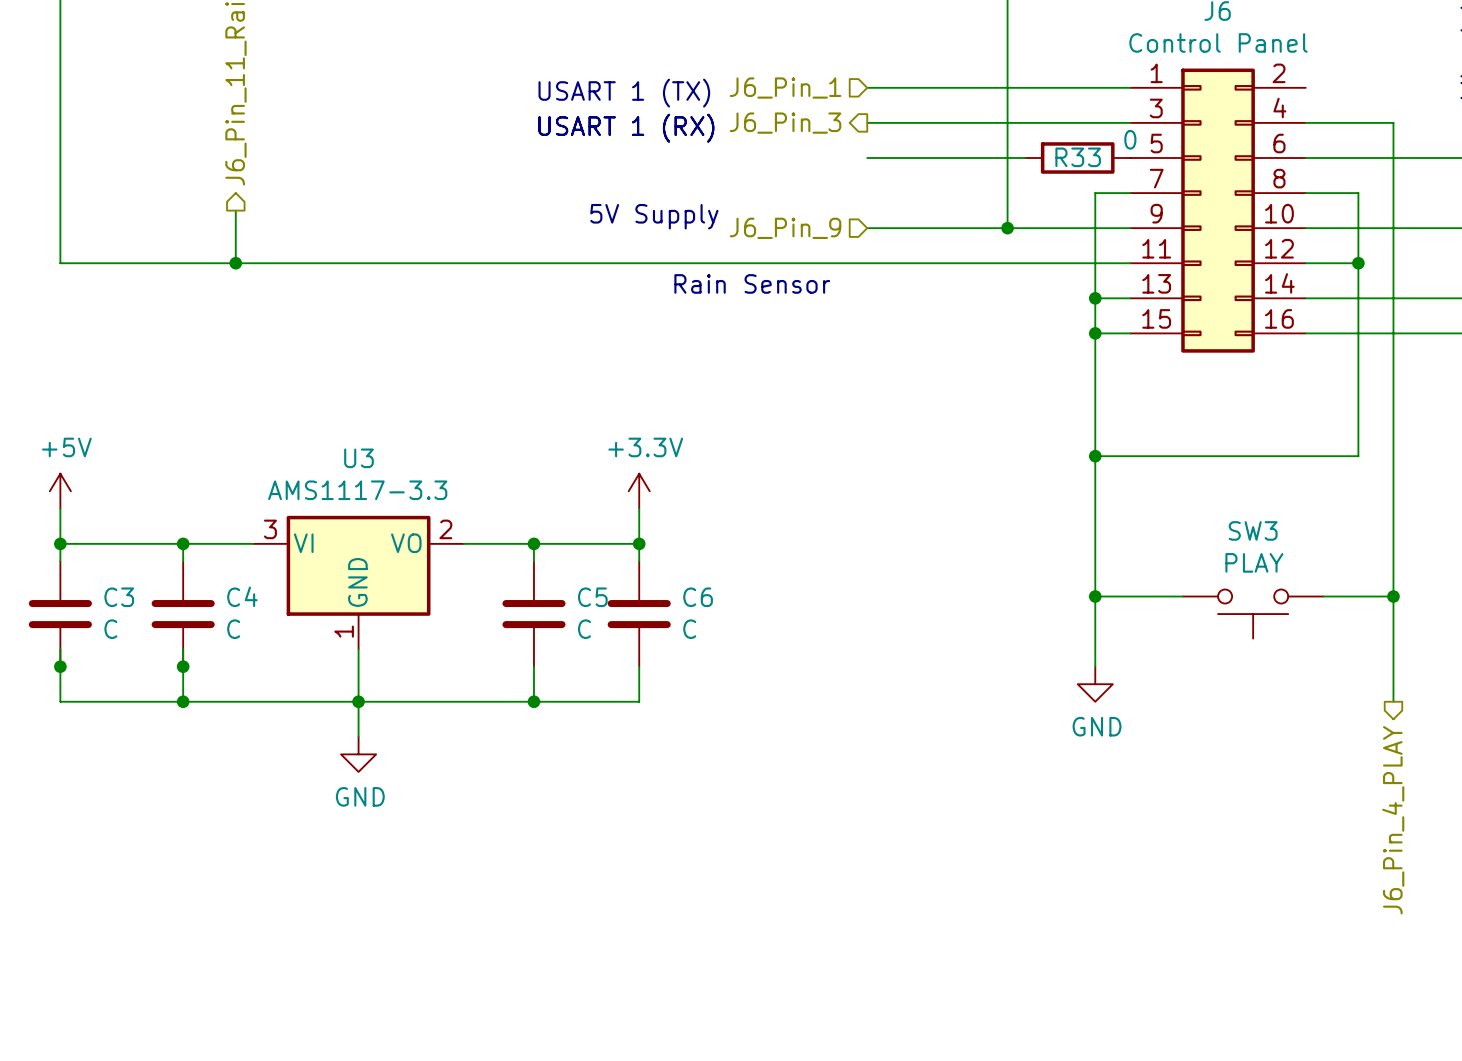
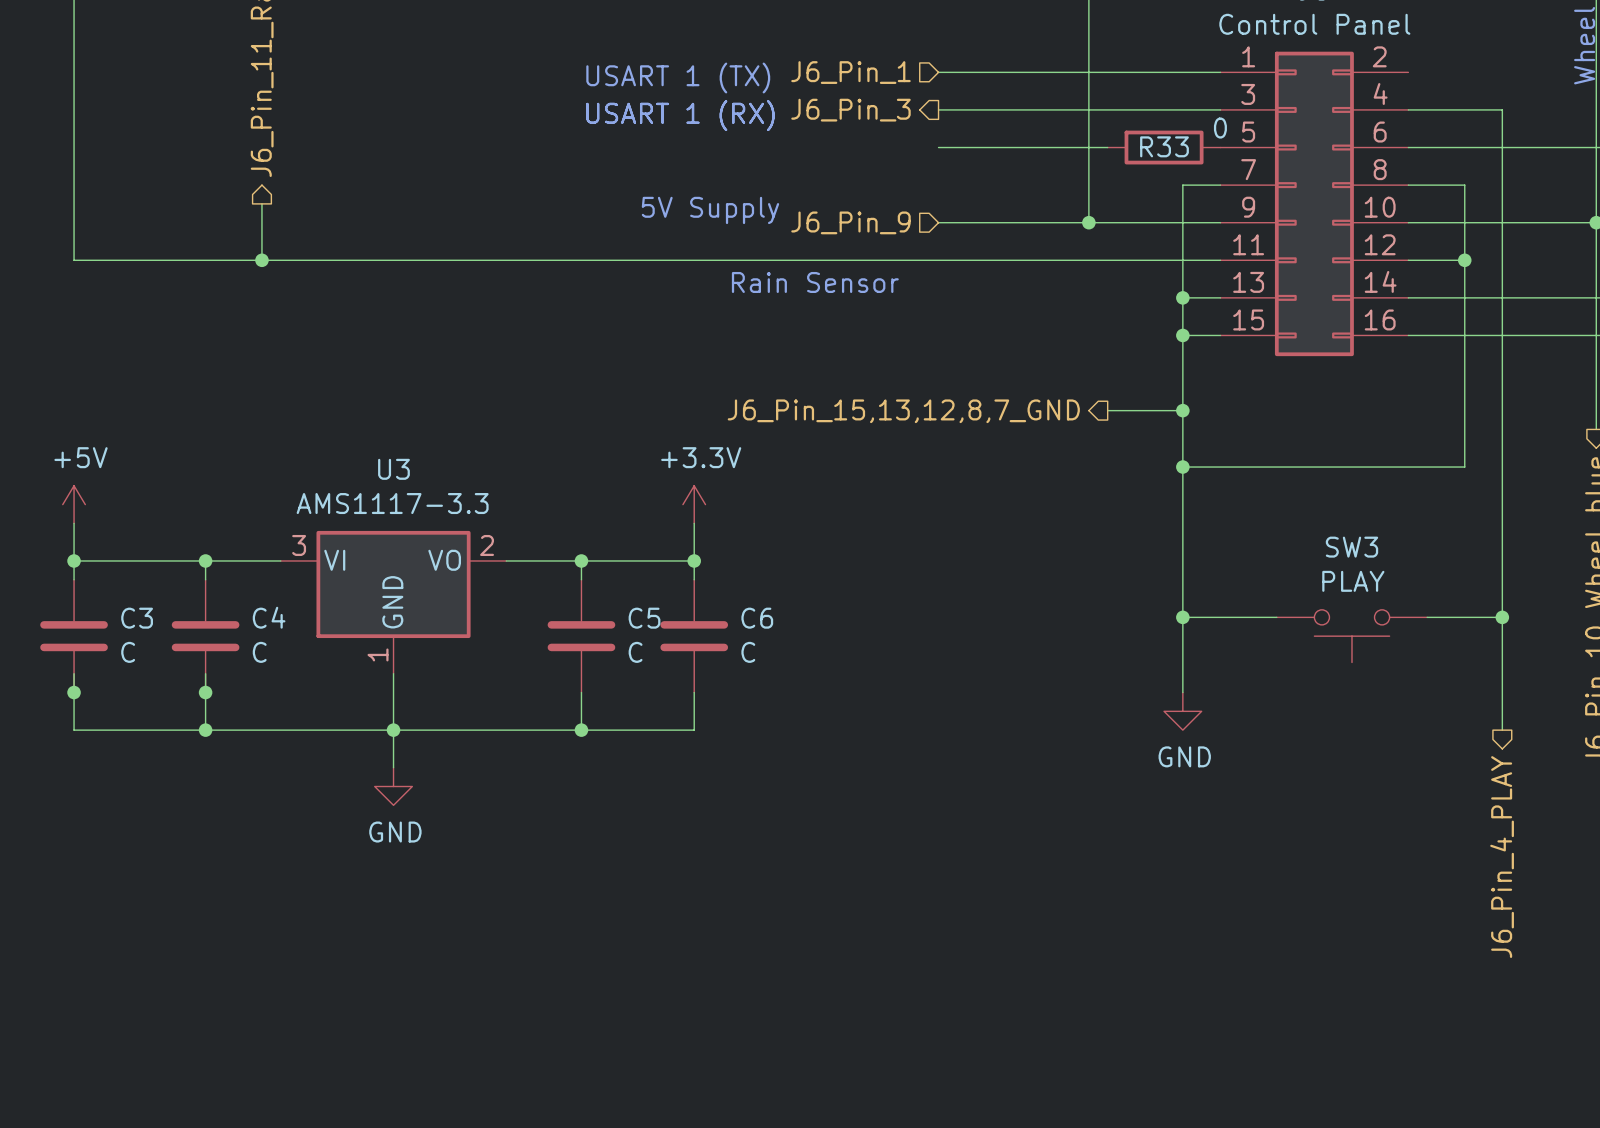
wire: none -> (1107, 410) (1182, 410)
junction: none -> (1182, 410)
hierarchical label: none -> J6_Pin_15,13,12,8,7_GND (903, 411)

